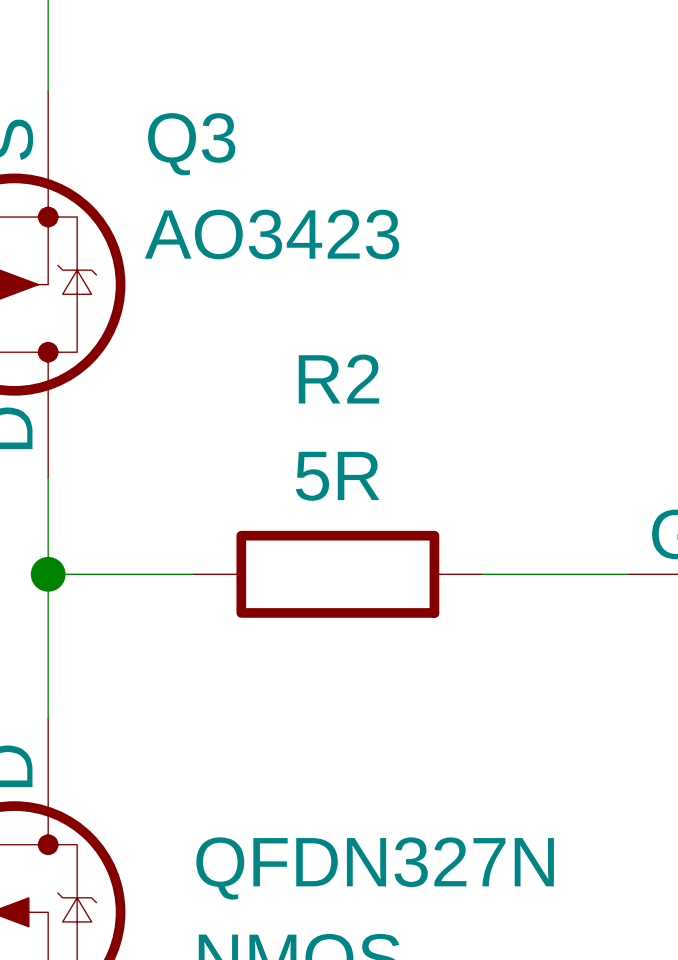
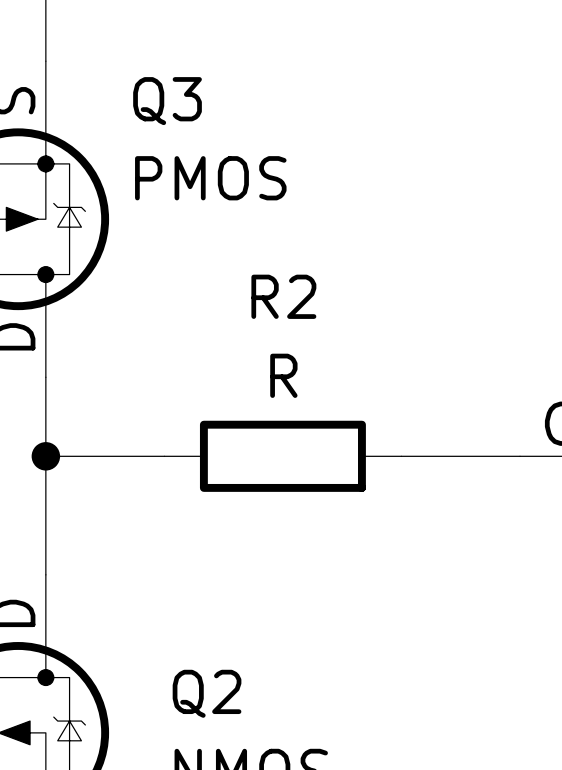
Q3 value: AO3423 (272, 234) -> PMOS (210, 178)
R2 value: 5R (337, 476) -> R (283, 375)
QFDN327N name: QFDN327N (375, 868) -> Q2 (207, 693)

